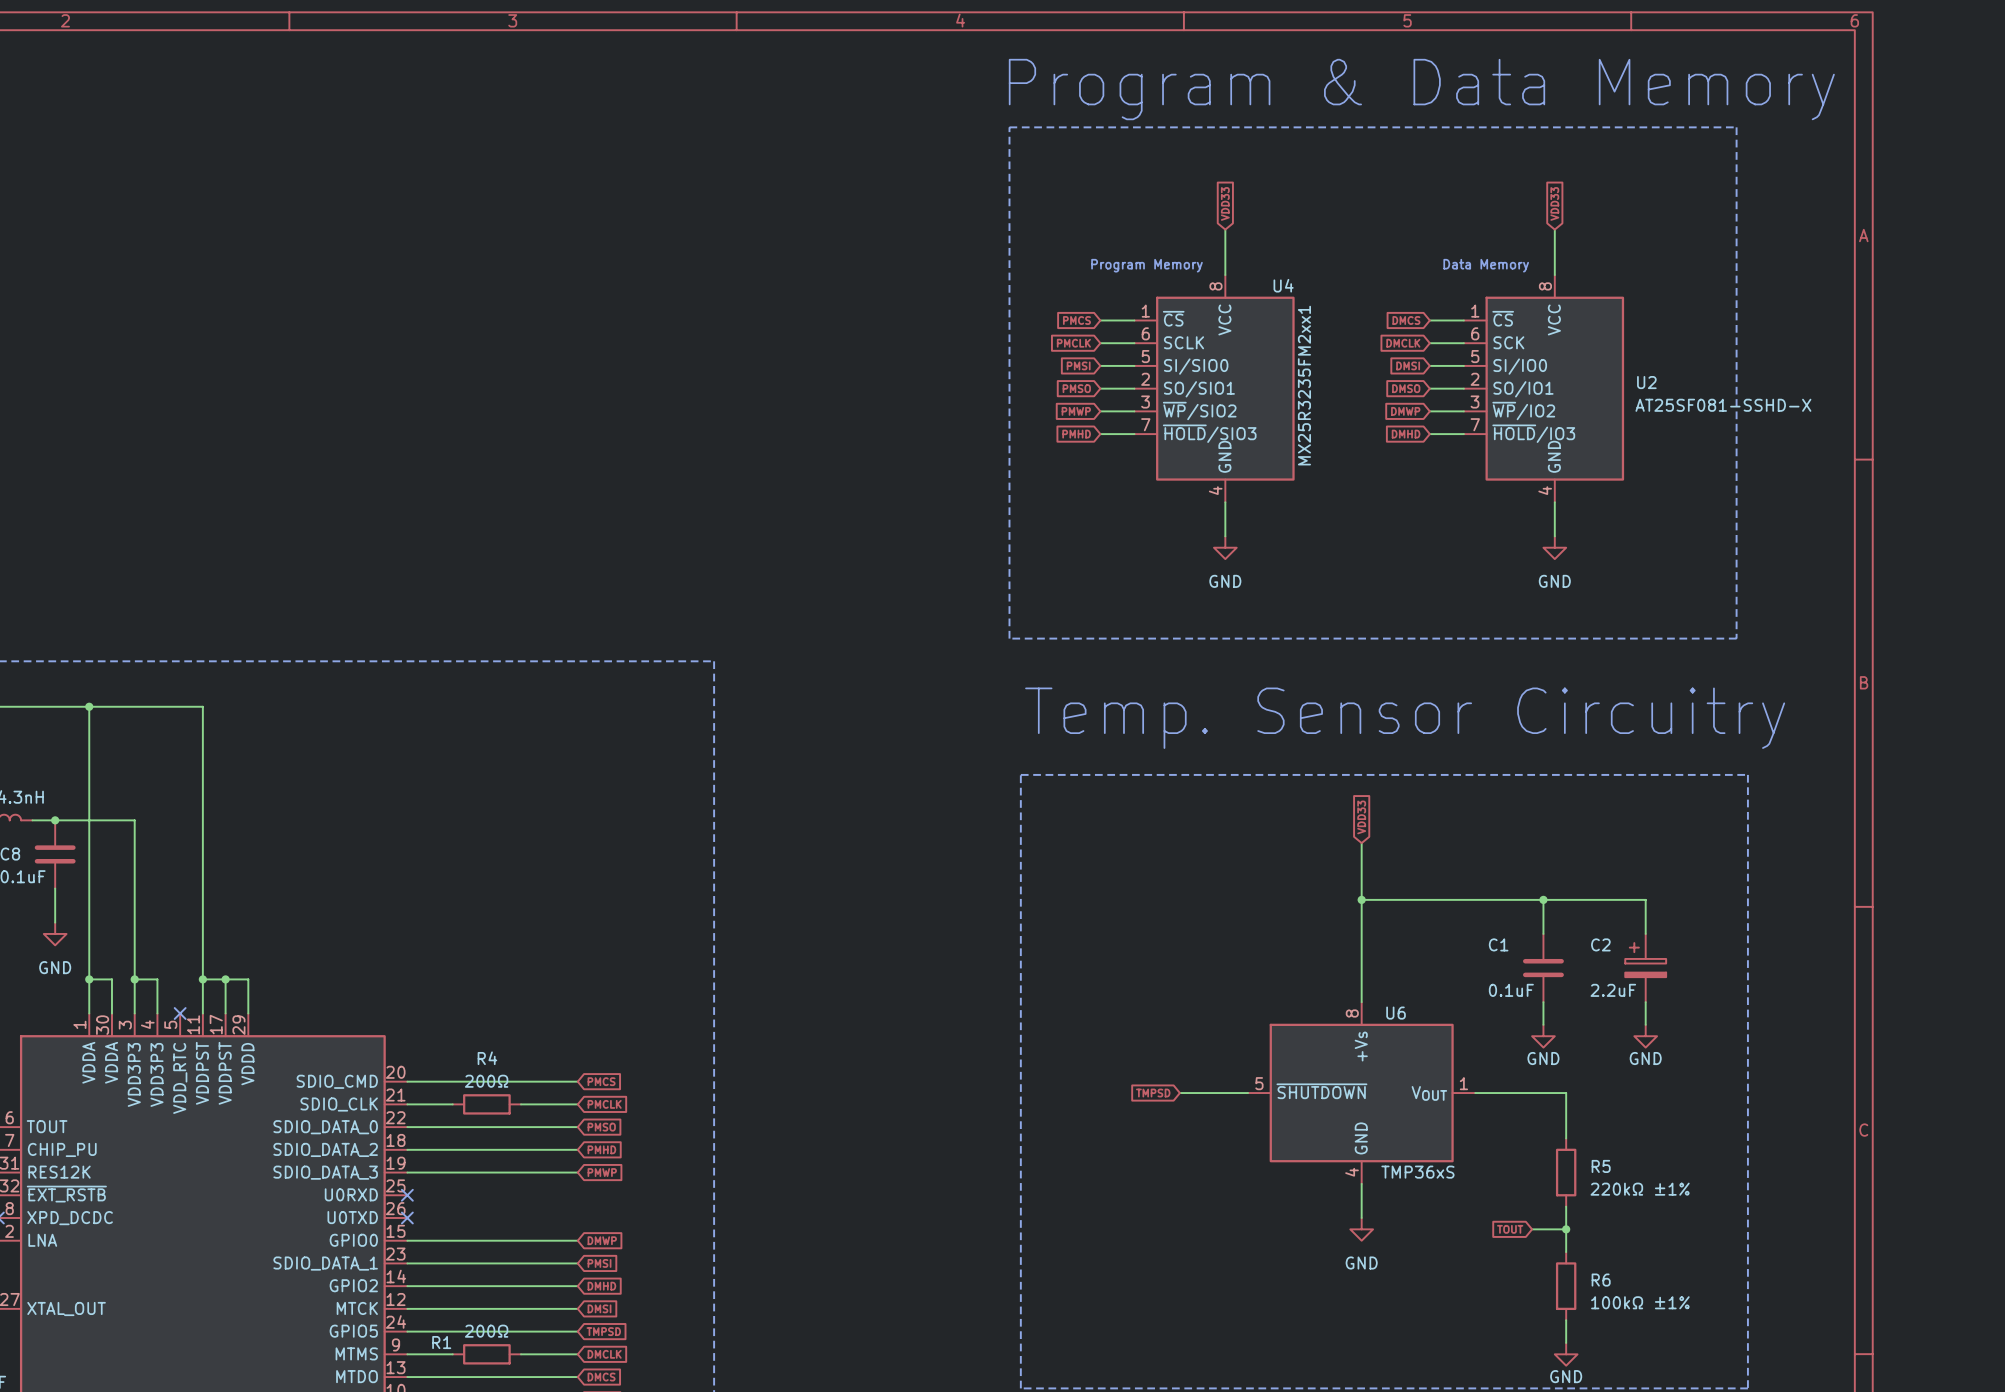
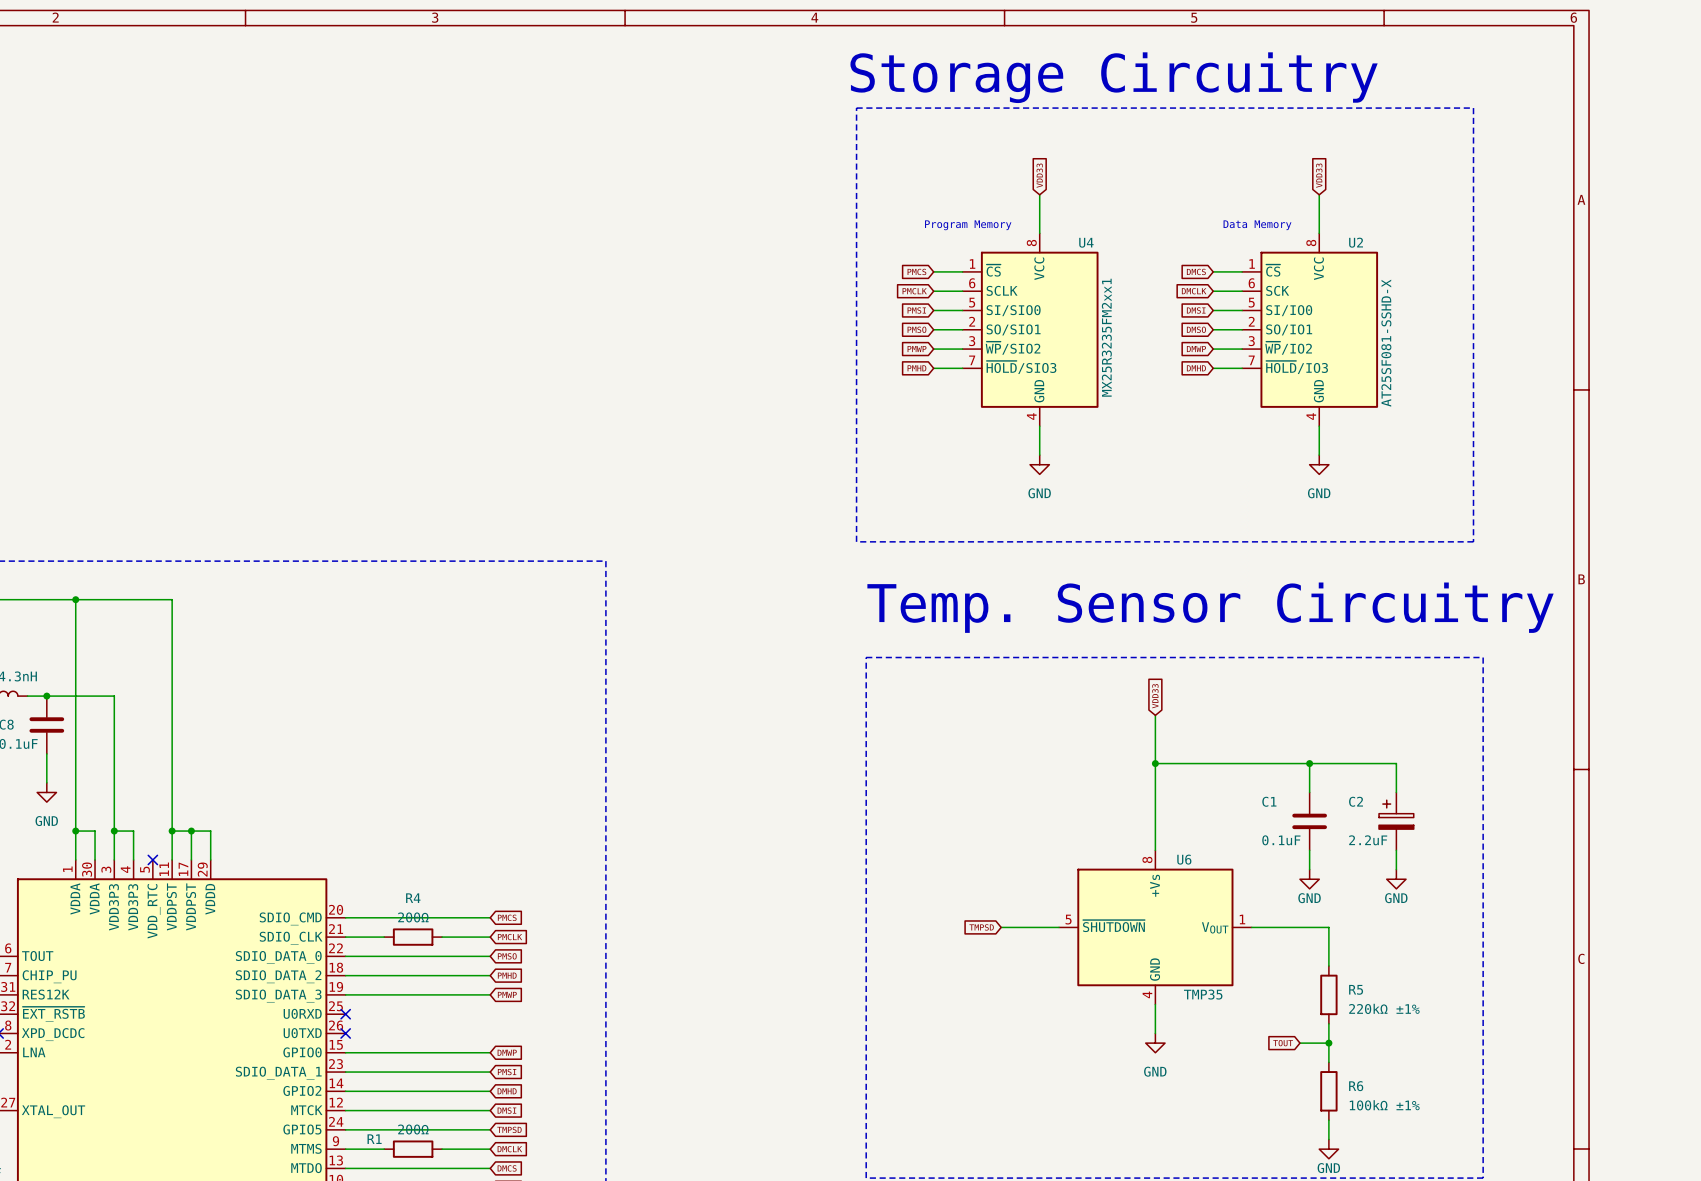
text: Program & Data Memory (1421, 89) -> Storage Circuitry (1114, 77)
U2 name position: U2 (1646, 382) -> U2 (1356, 242)
U2 value rotation: 0° (1723, 405) -> 90° counterclockwise (1386, 343)
U6 value: TMP36xS (1417, 1172) -> TMP35 (1203, 994)

